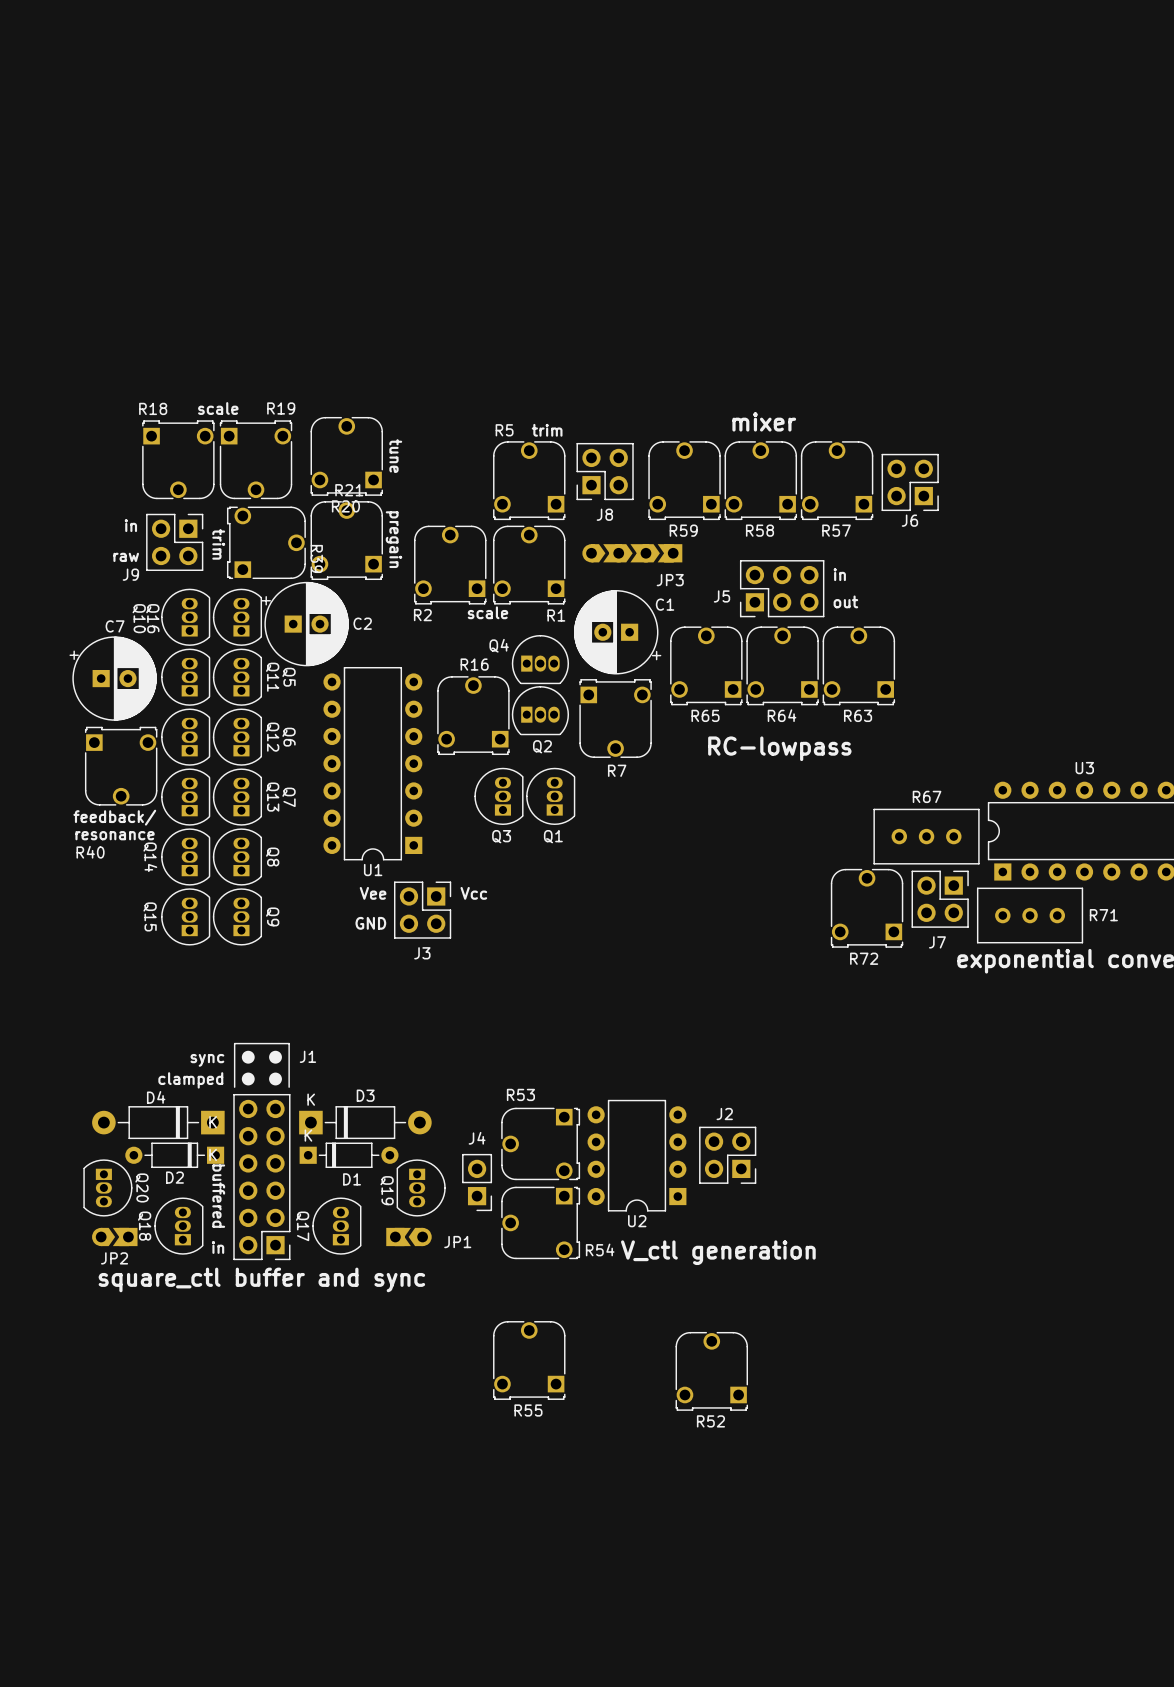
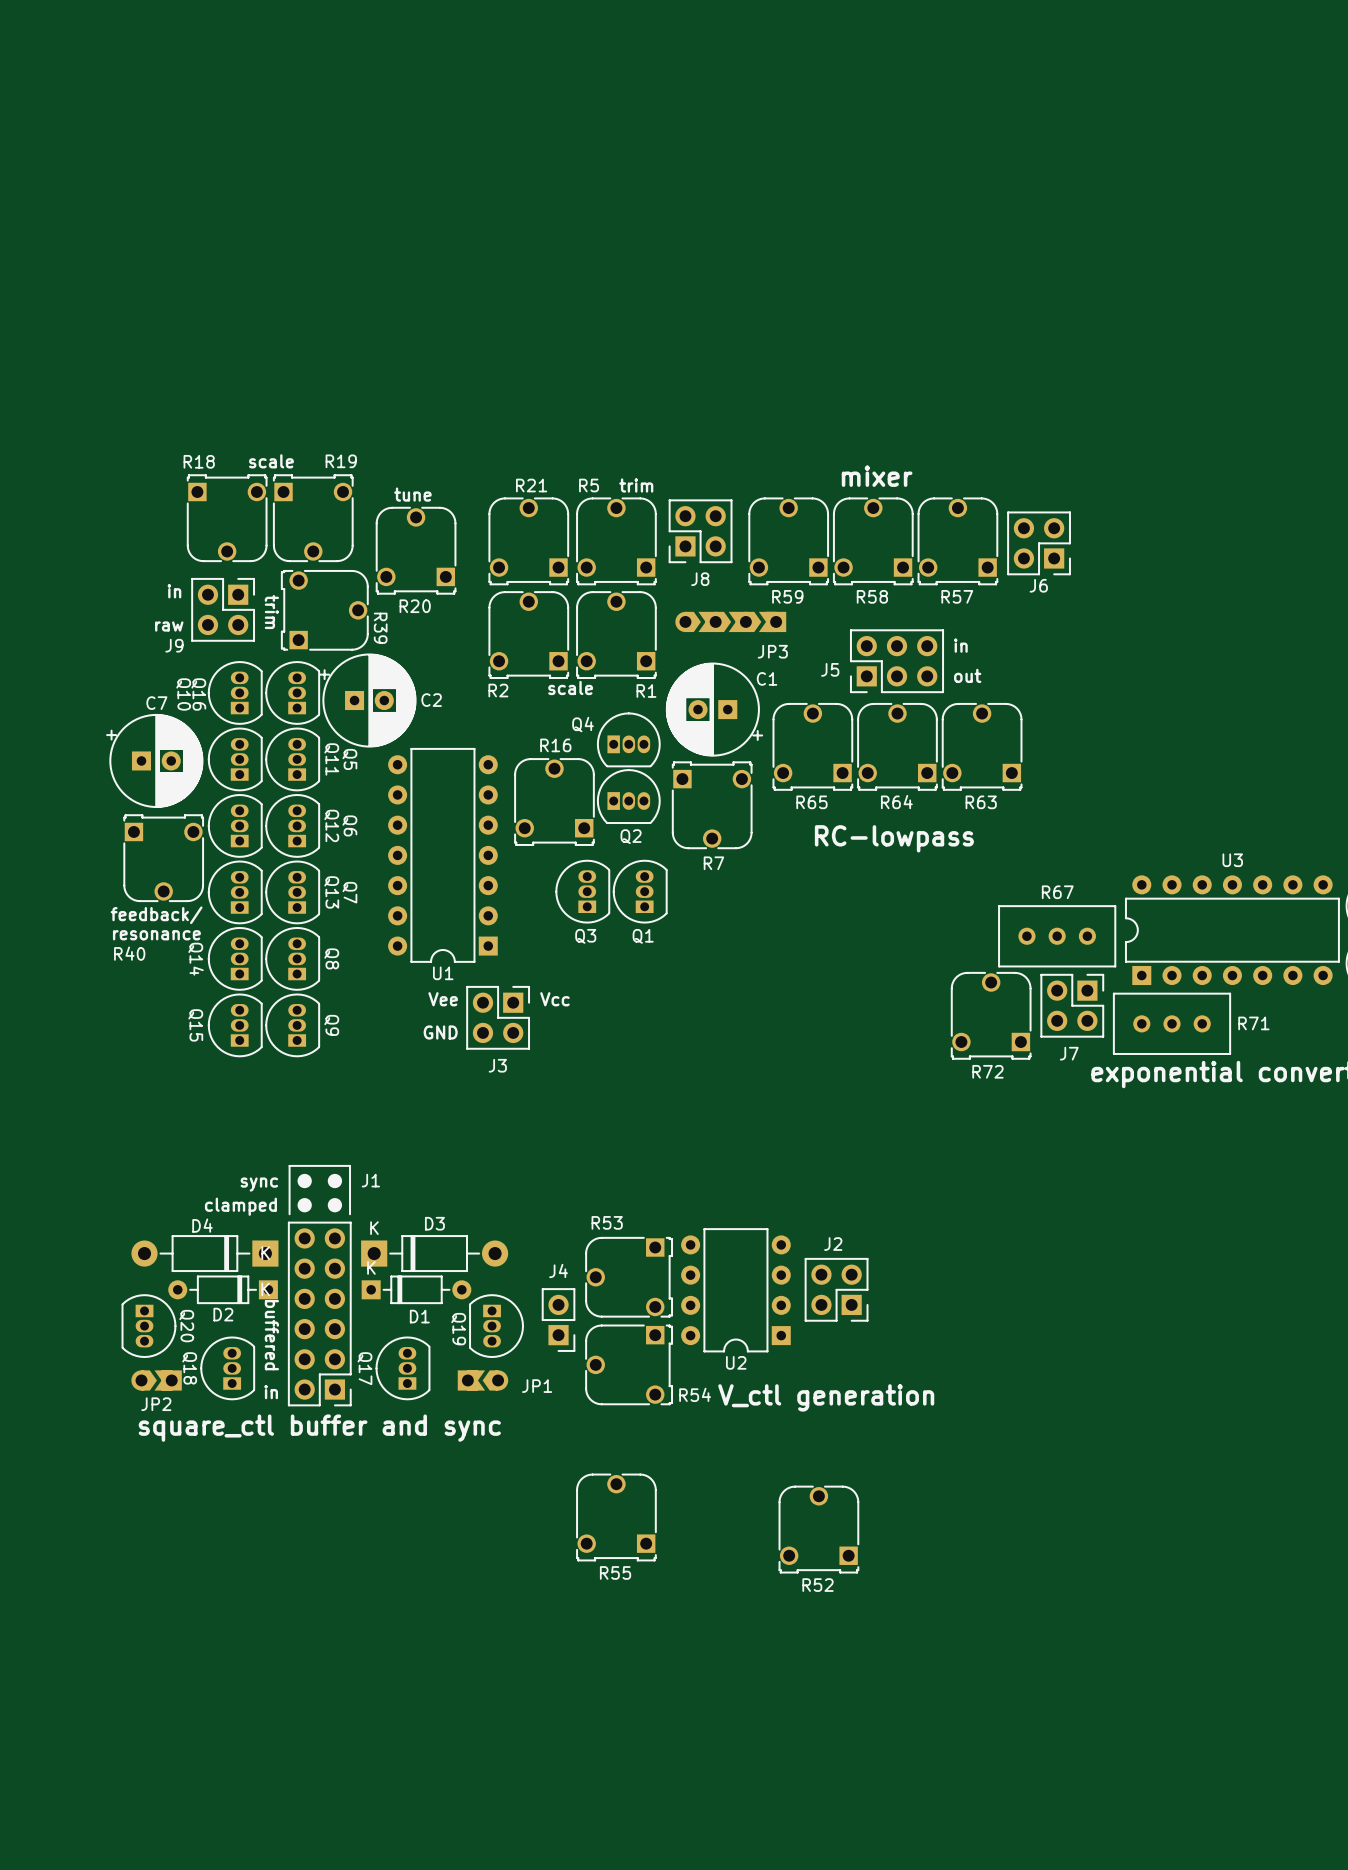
R20 position: (346, 456) -> (416, 550)
text rotation: 0° (395, 456) -> 90° counterclockwise (412, 494)
text position: tune (395, 456) -> tune (412, 494)
text: pregain (393, 539) -> none
R21 position: (346, 540) -> (528, 541)

